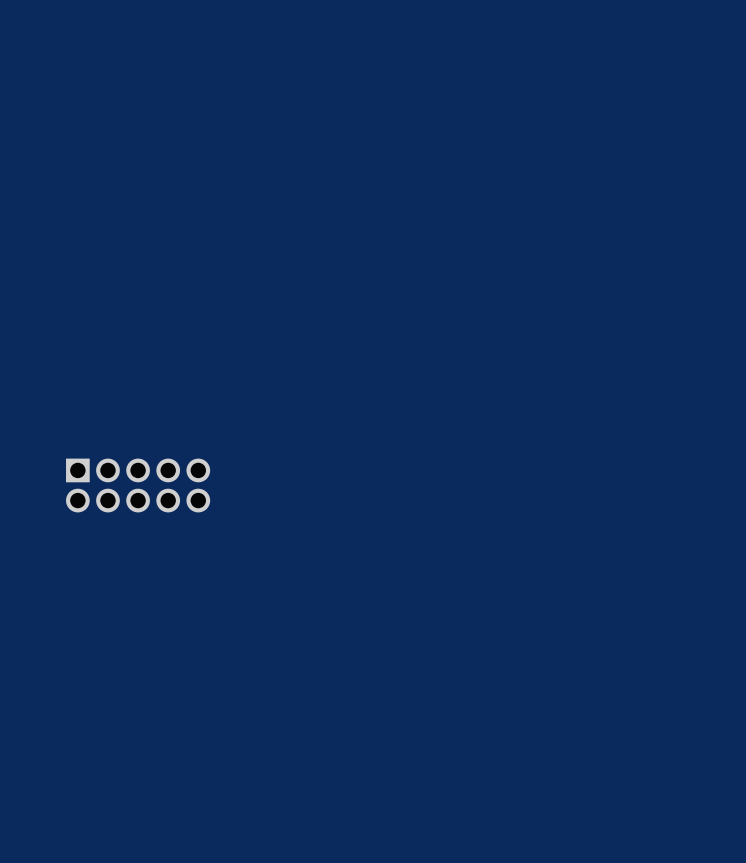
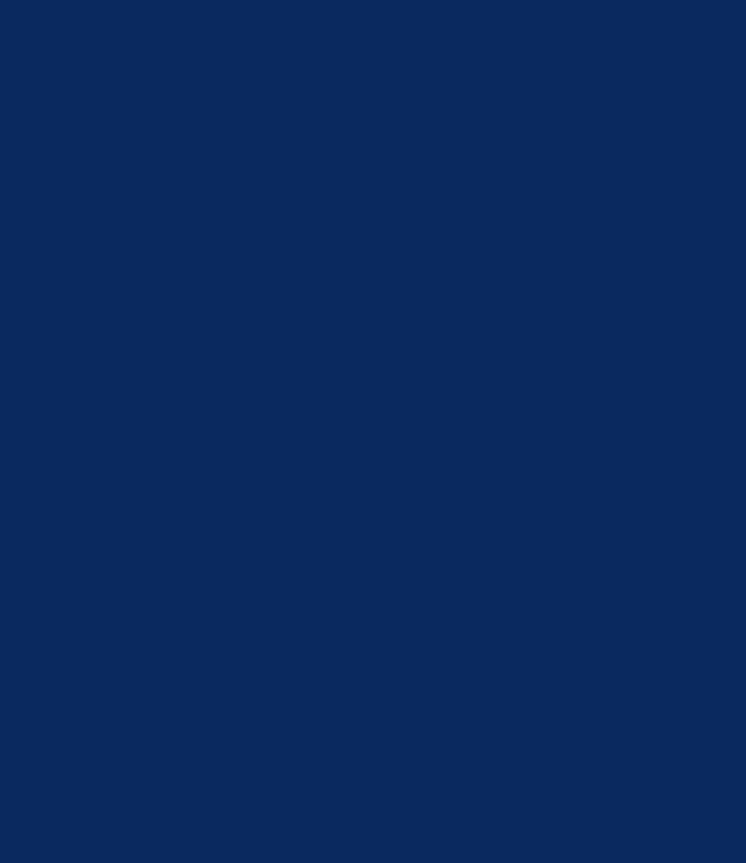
part: (138, 485) -> none

